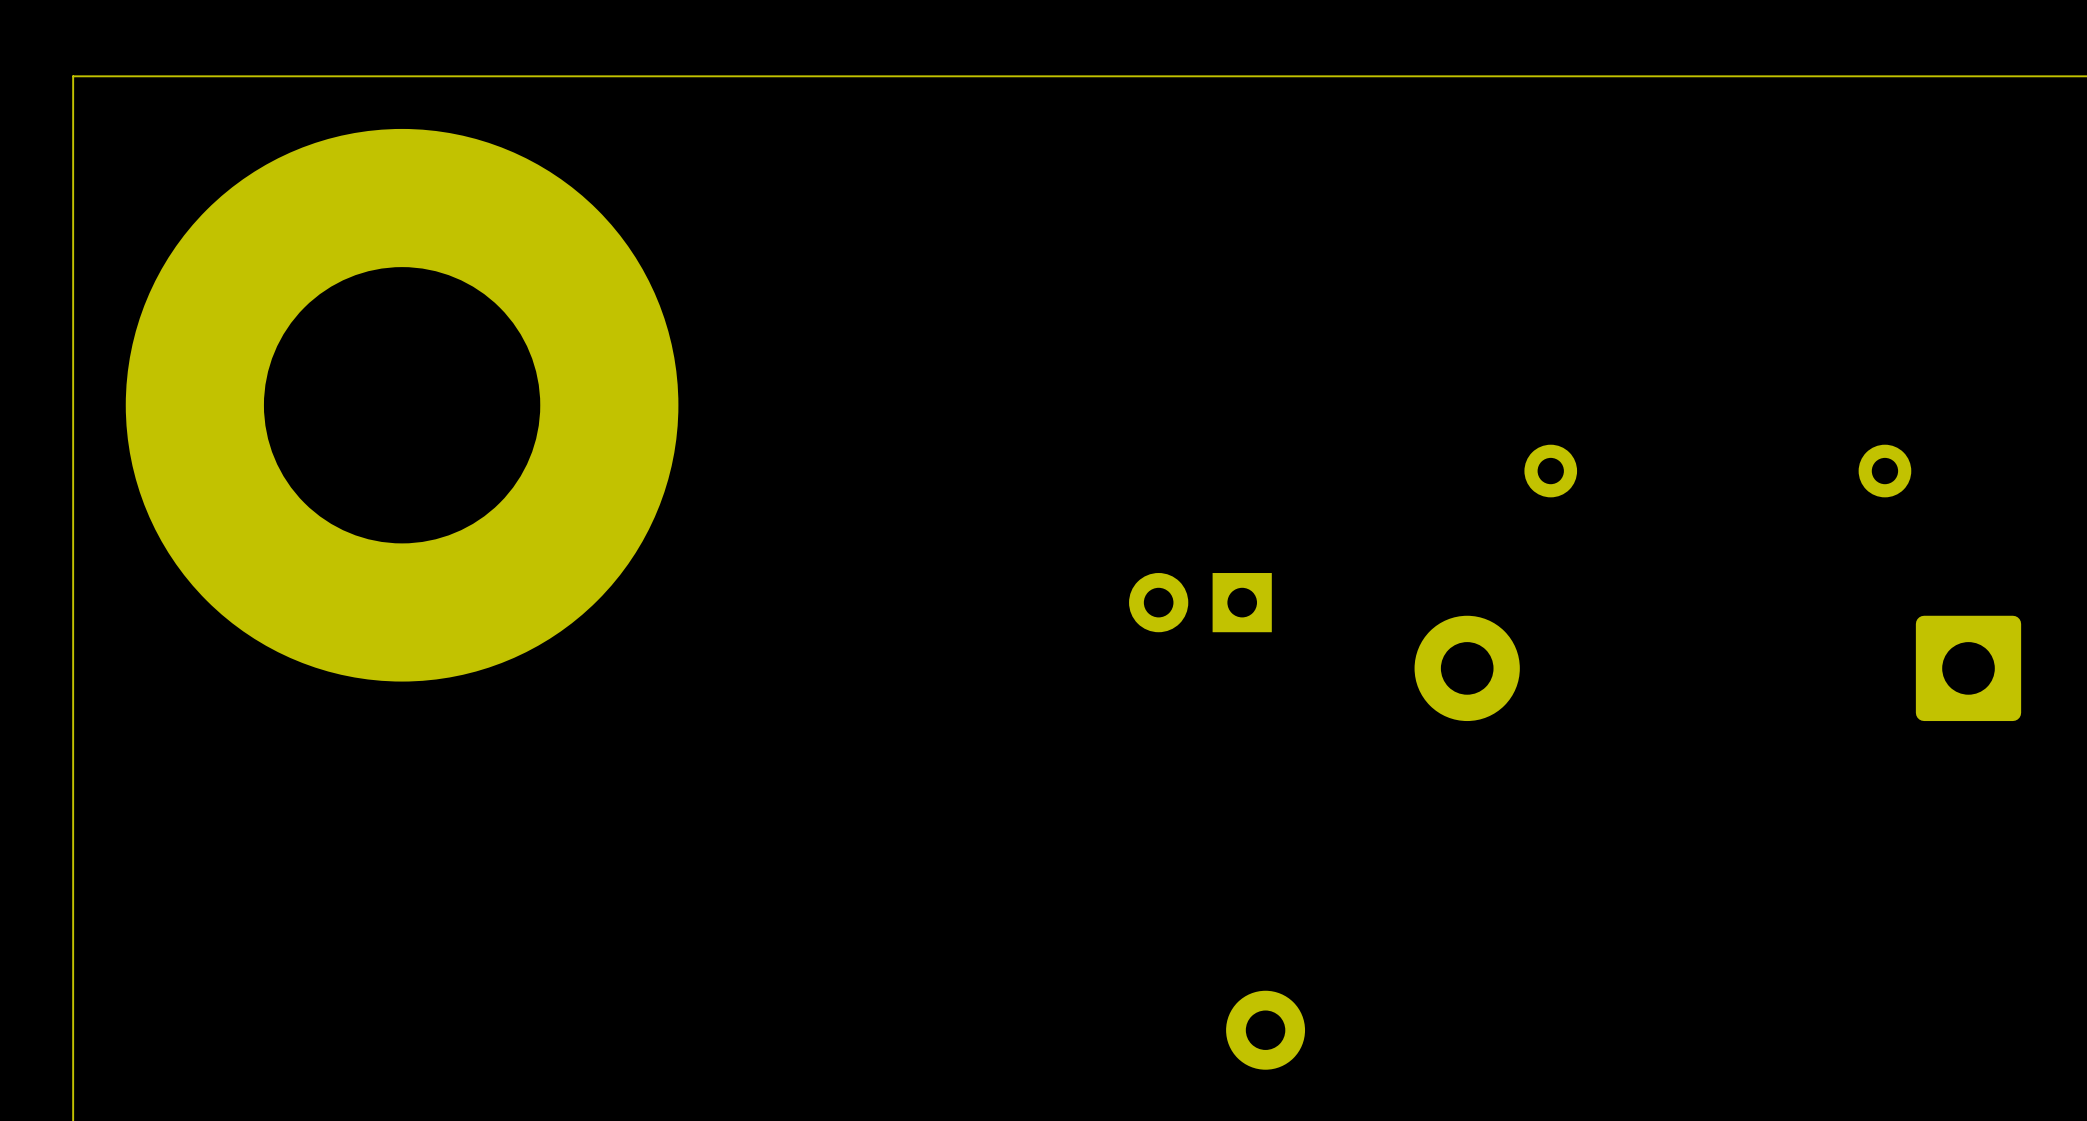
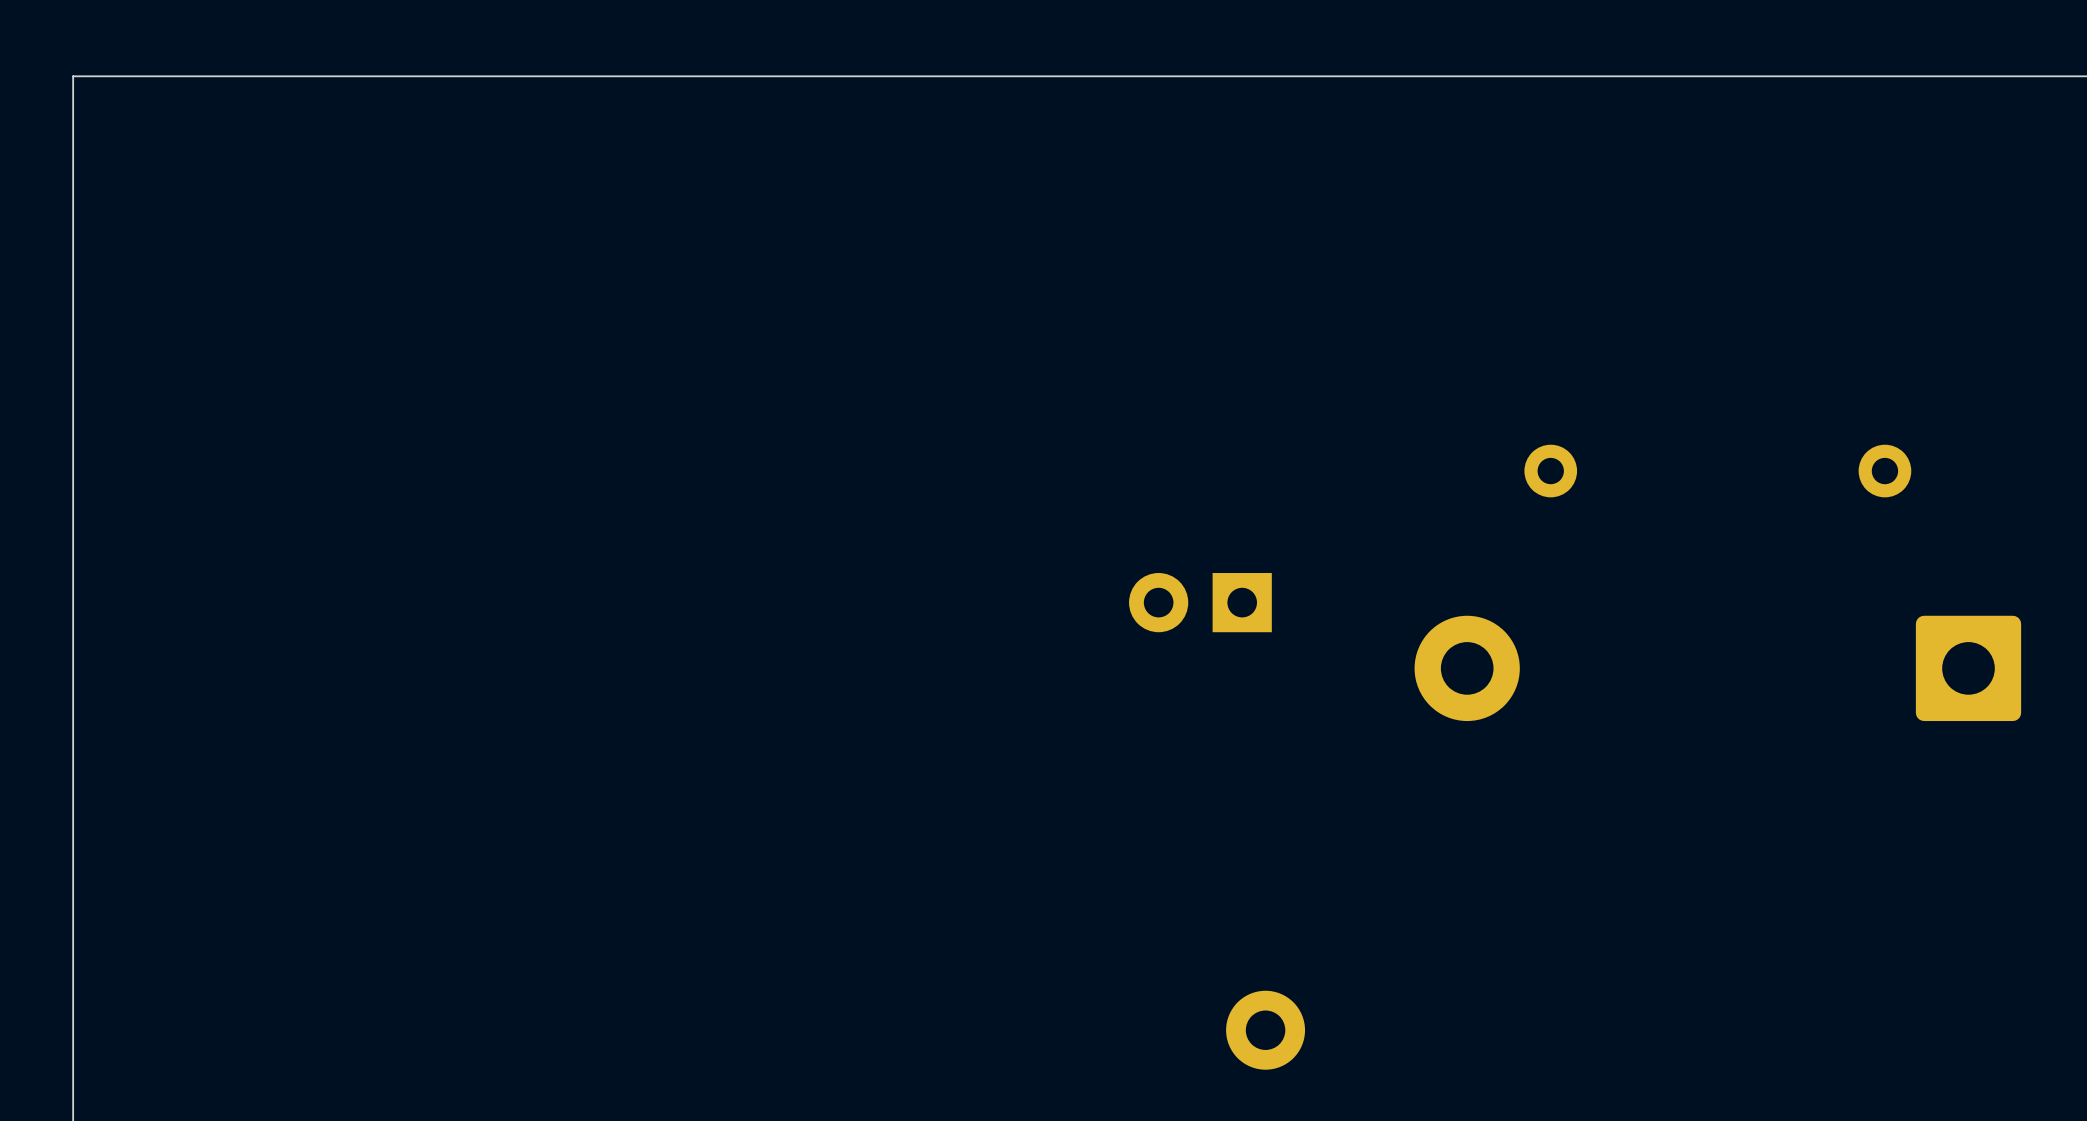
part: (402, 405) -> none

